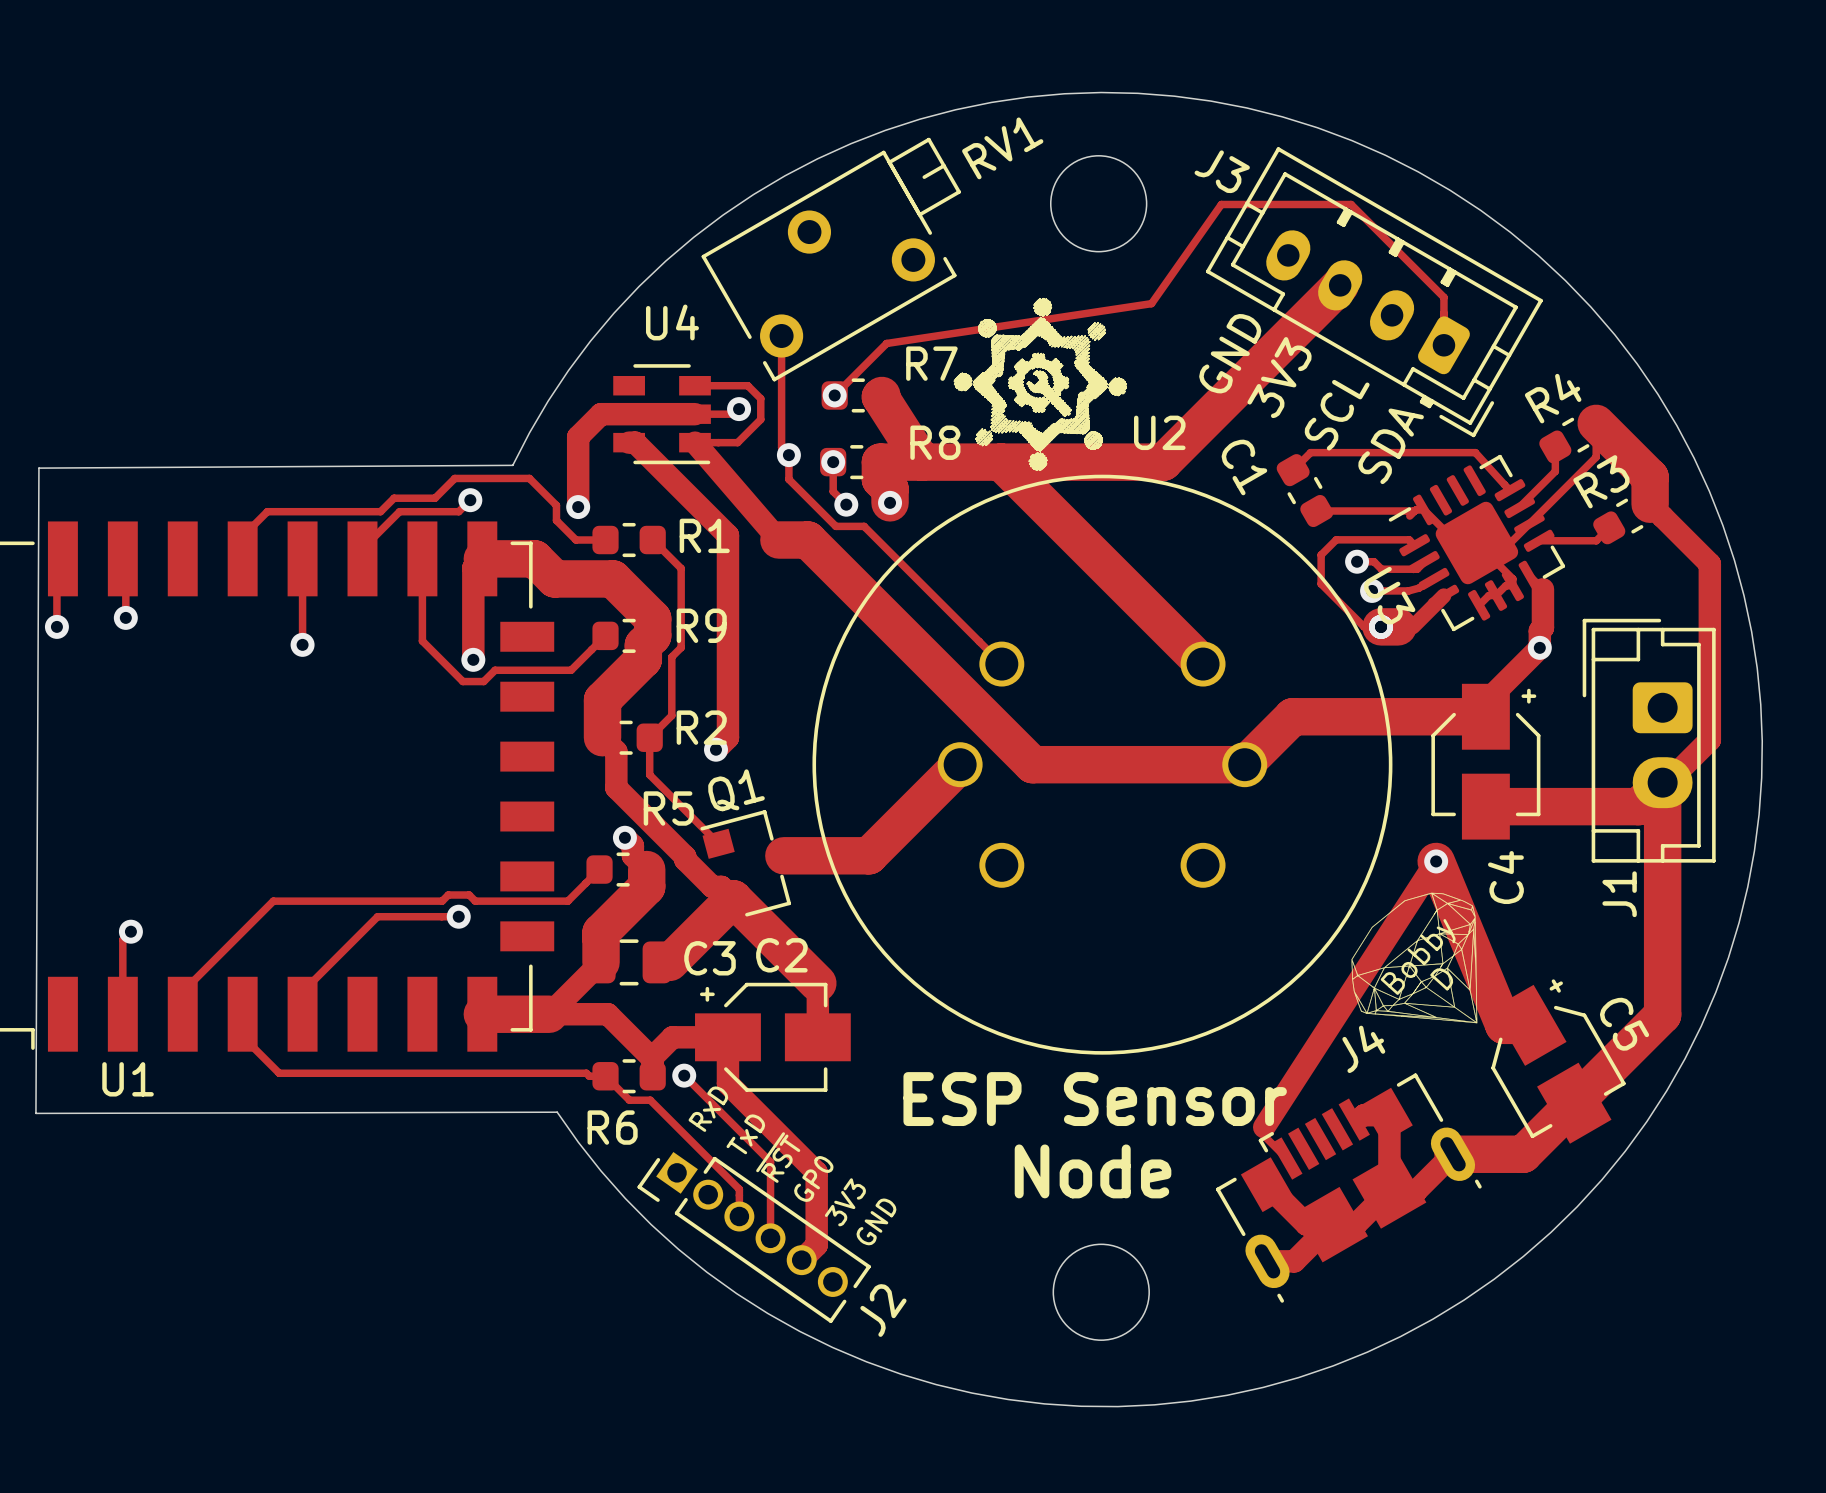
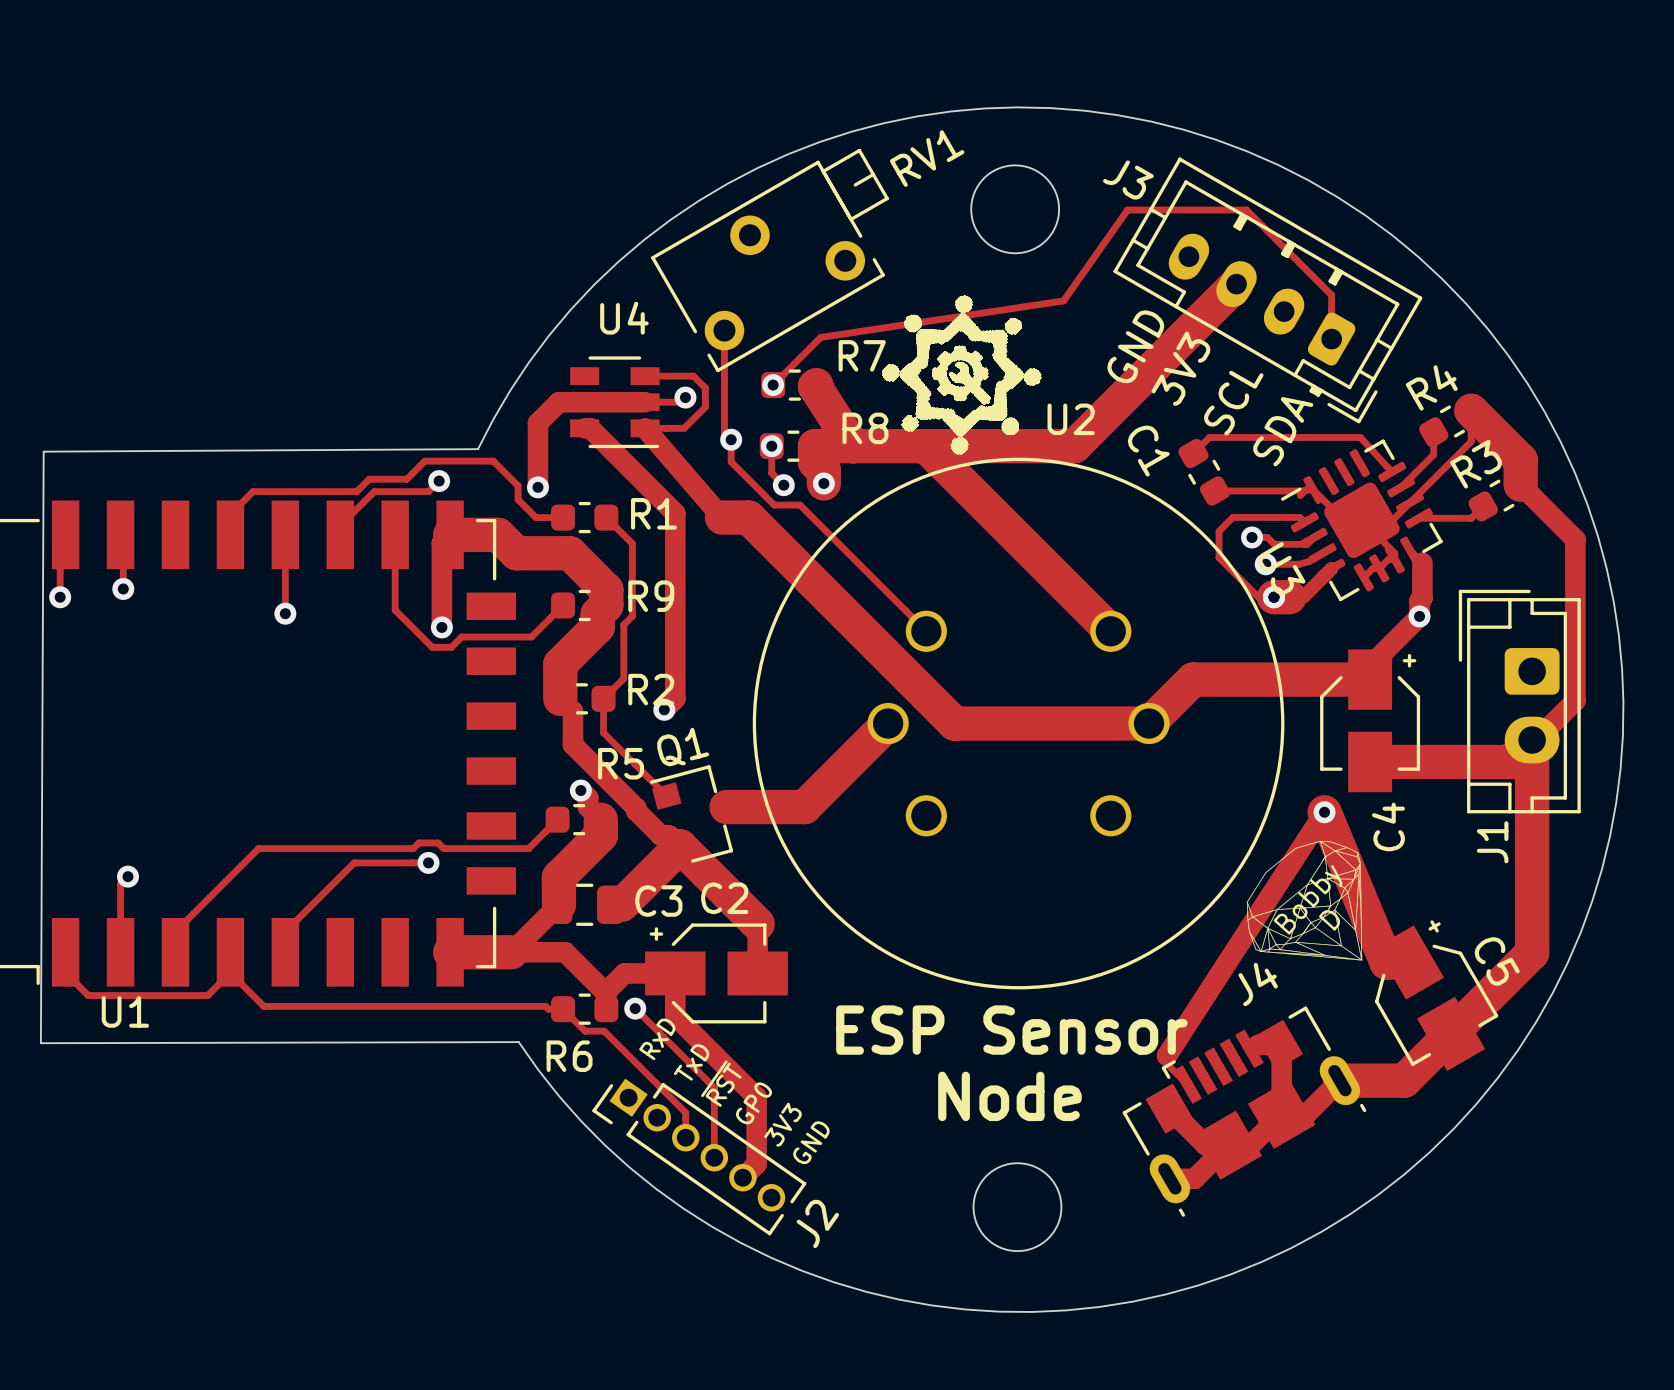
track: none -> (65, 952) (65, 972) (88, 995) (207, 995) (230, 972)

